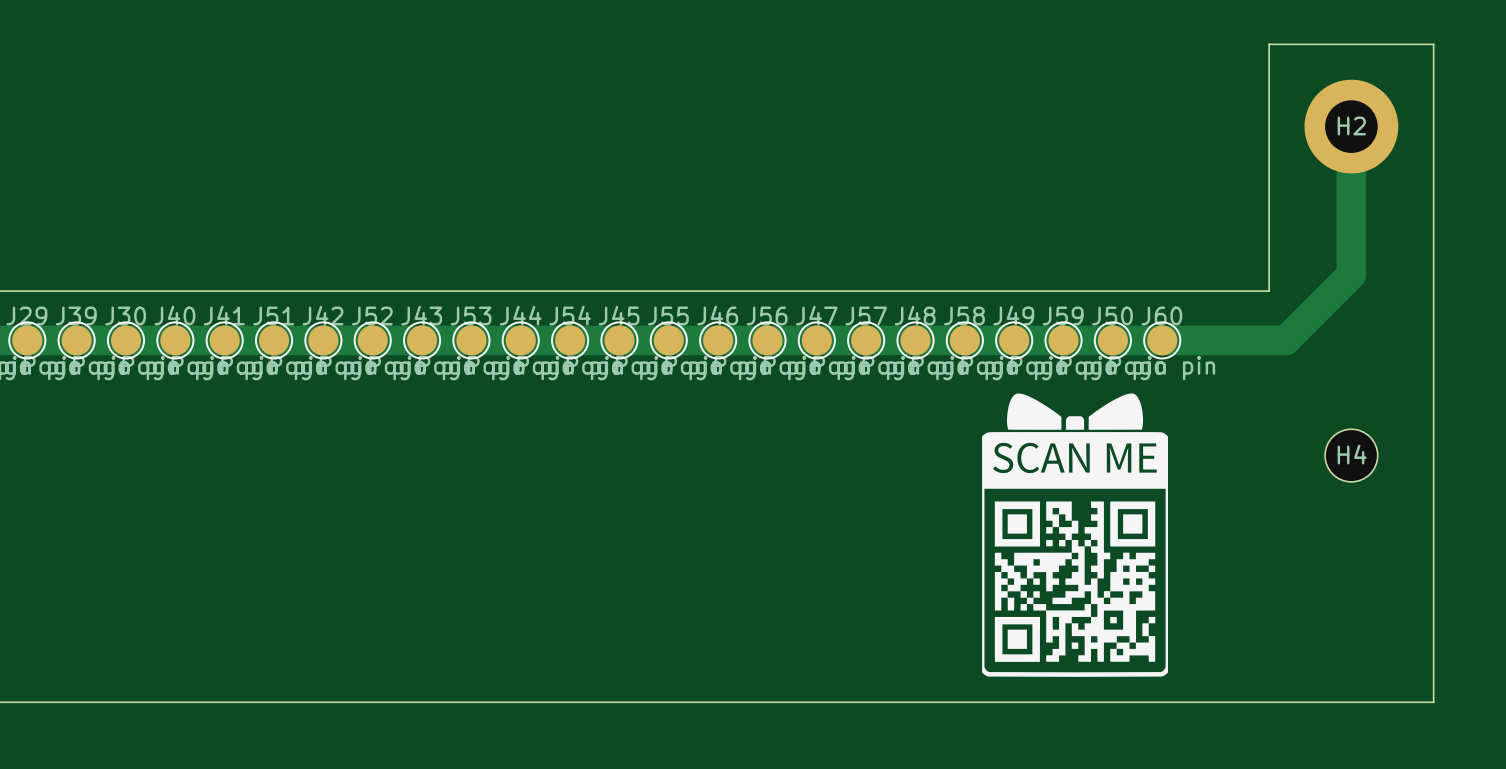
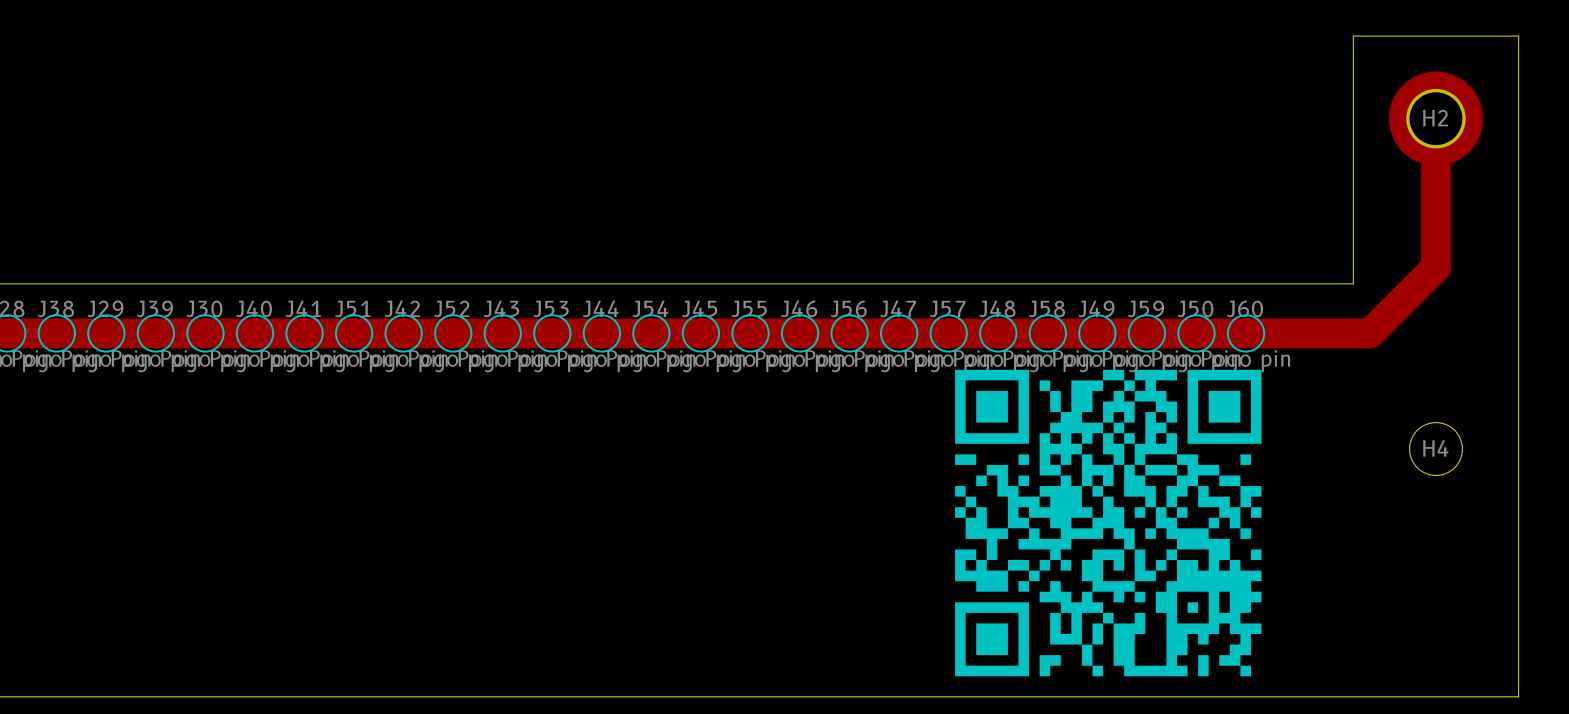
drawing: none -> [955, 369, 1262, 677]
drawing: [982, 393, 1168, 677] -> none
drawing shape: [1007, 393, 1062, 430] -> [1103, 390, 1135, 434]
drawing shape: [1110, 616, 1117, 624] -> [1187, 602, 1199, 613]

